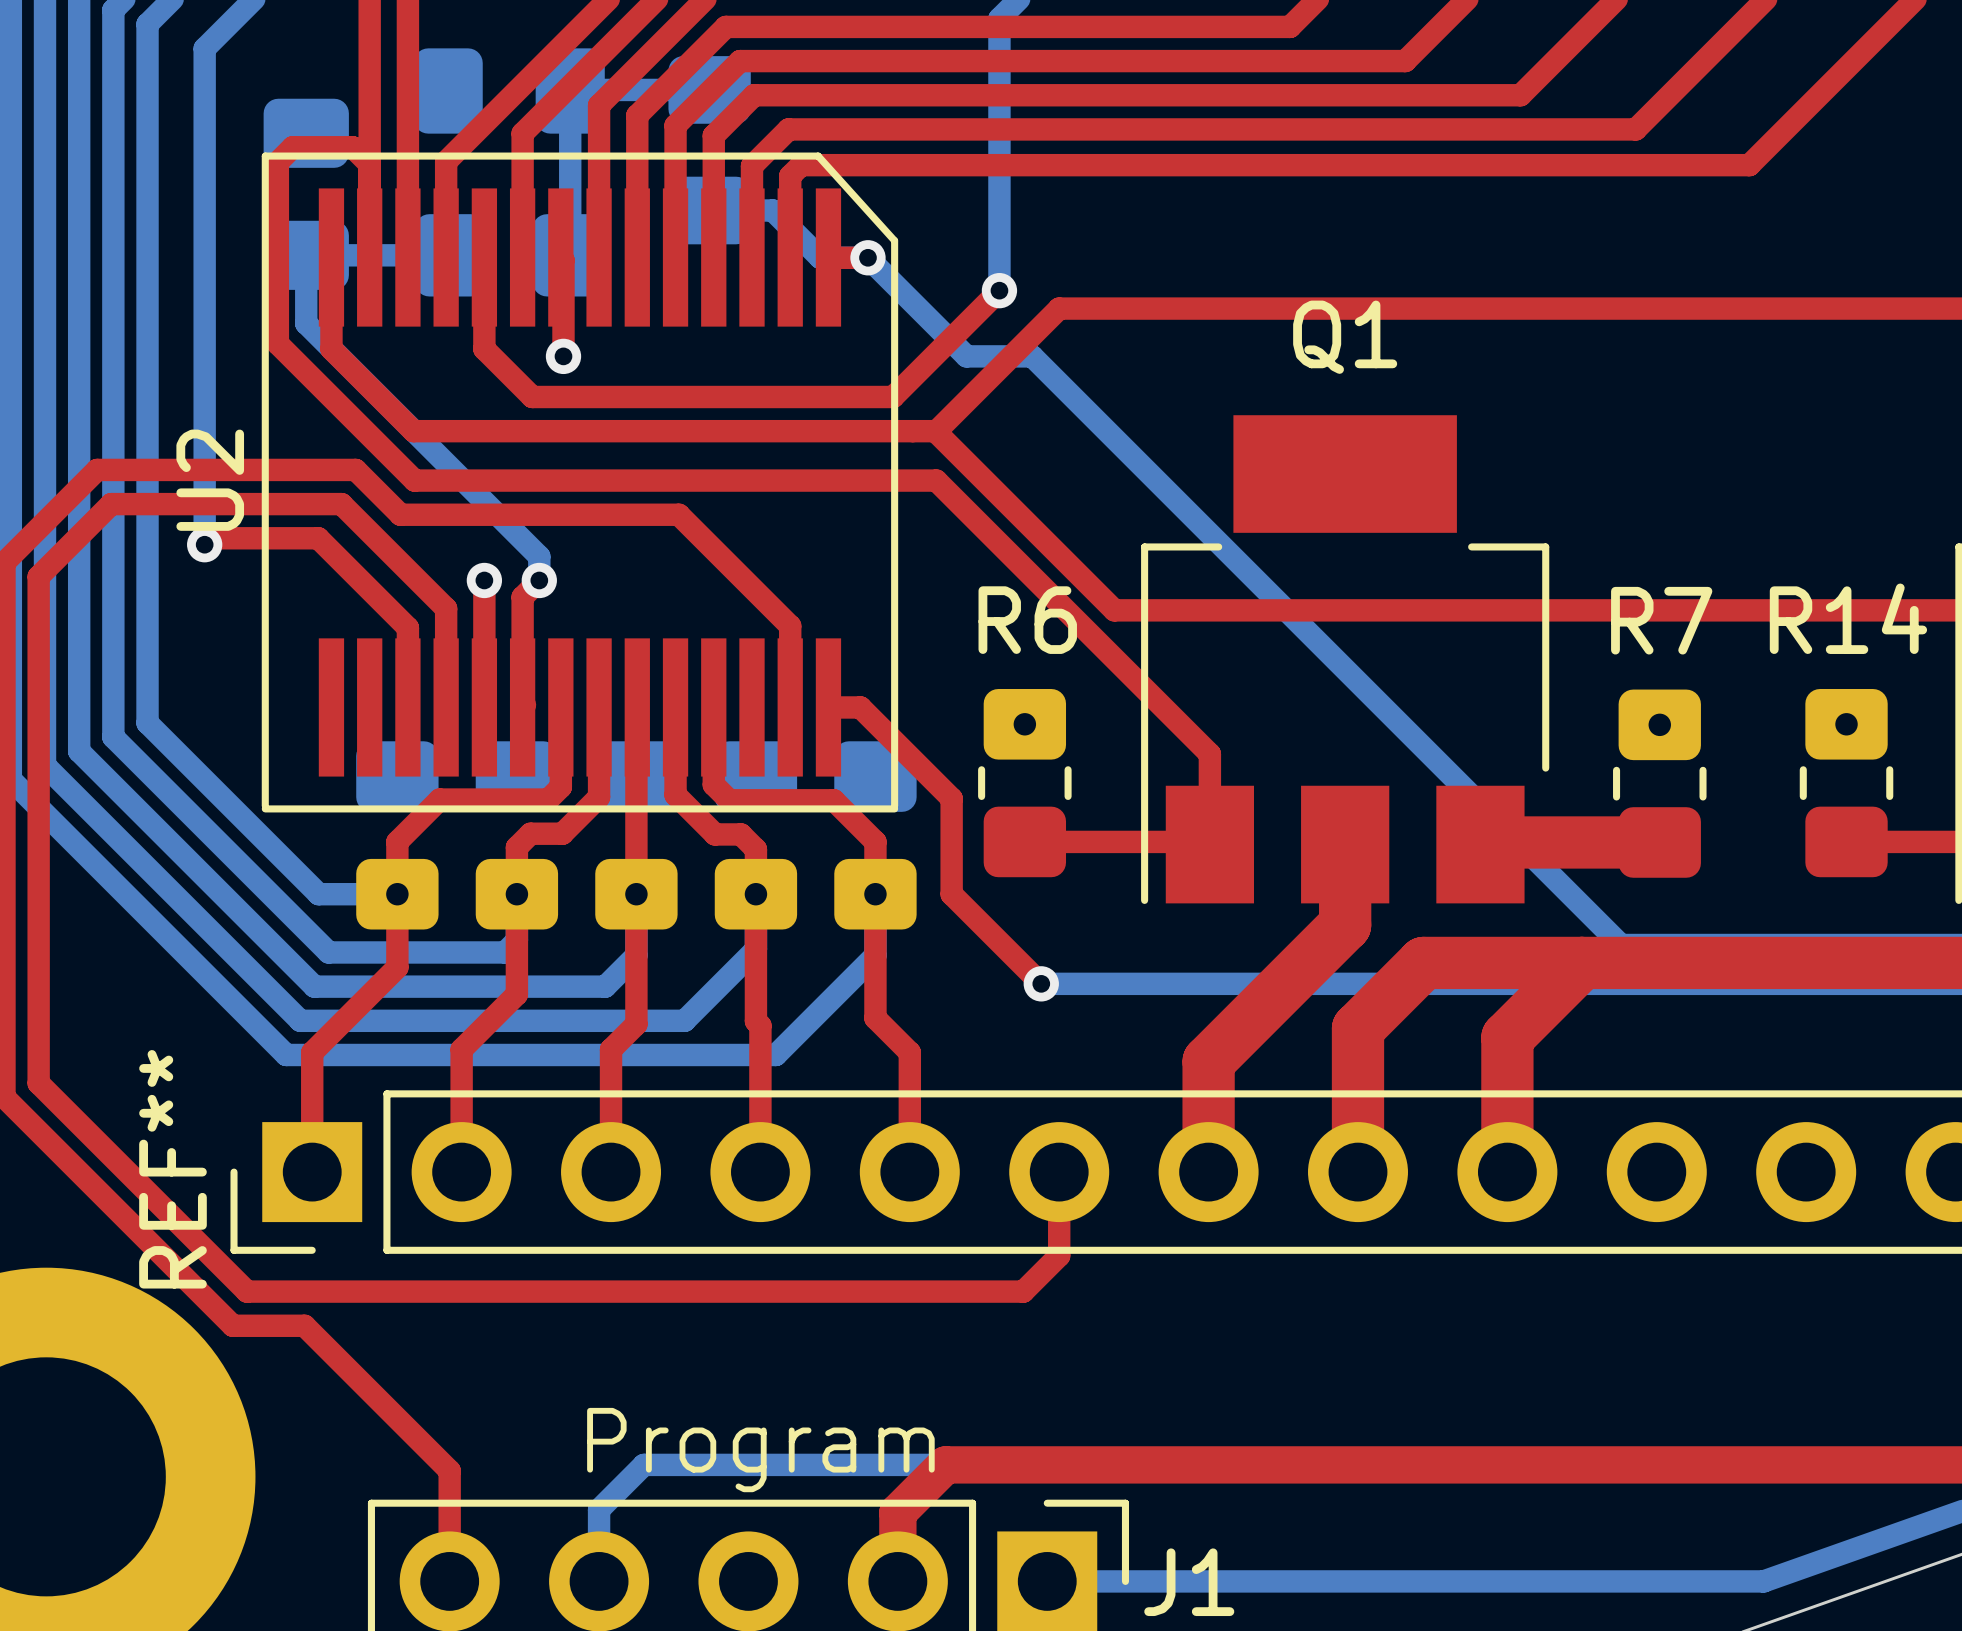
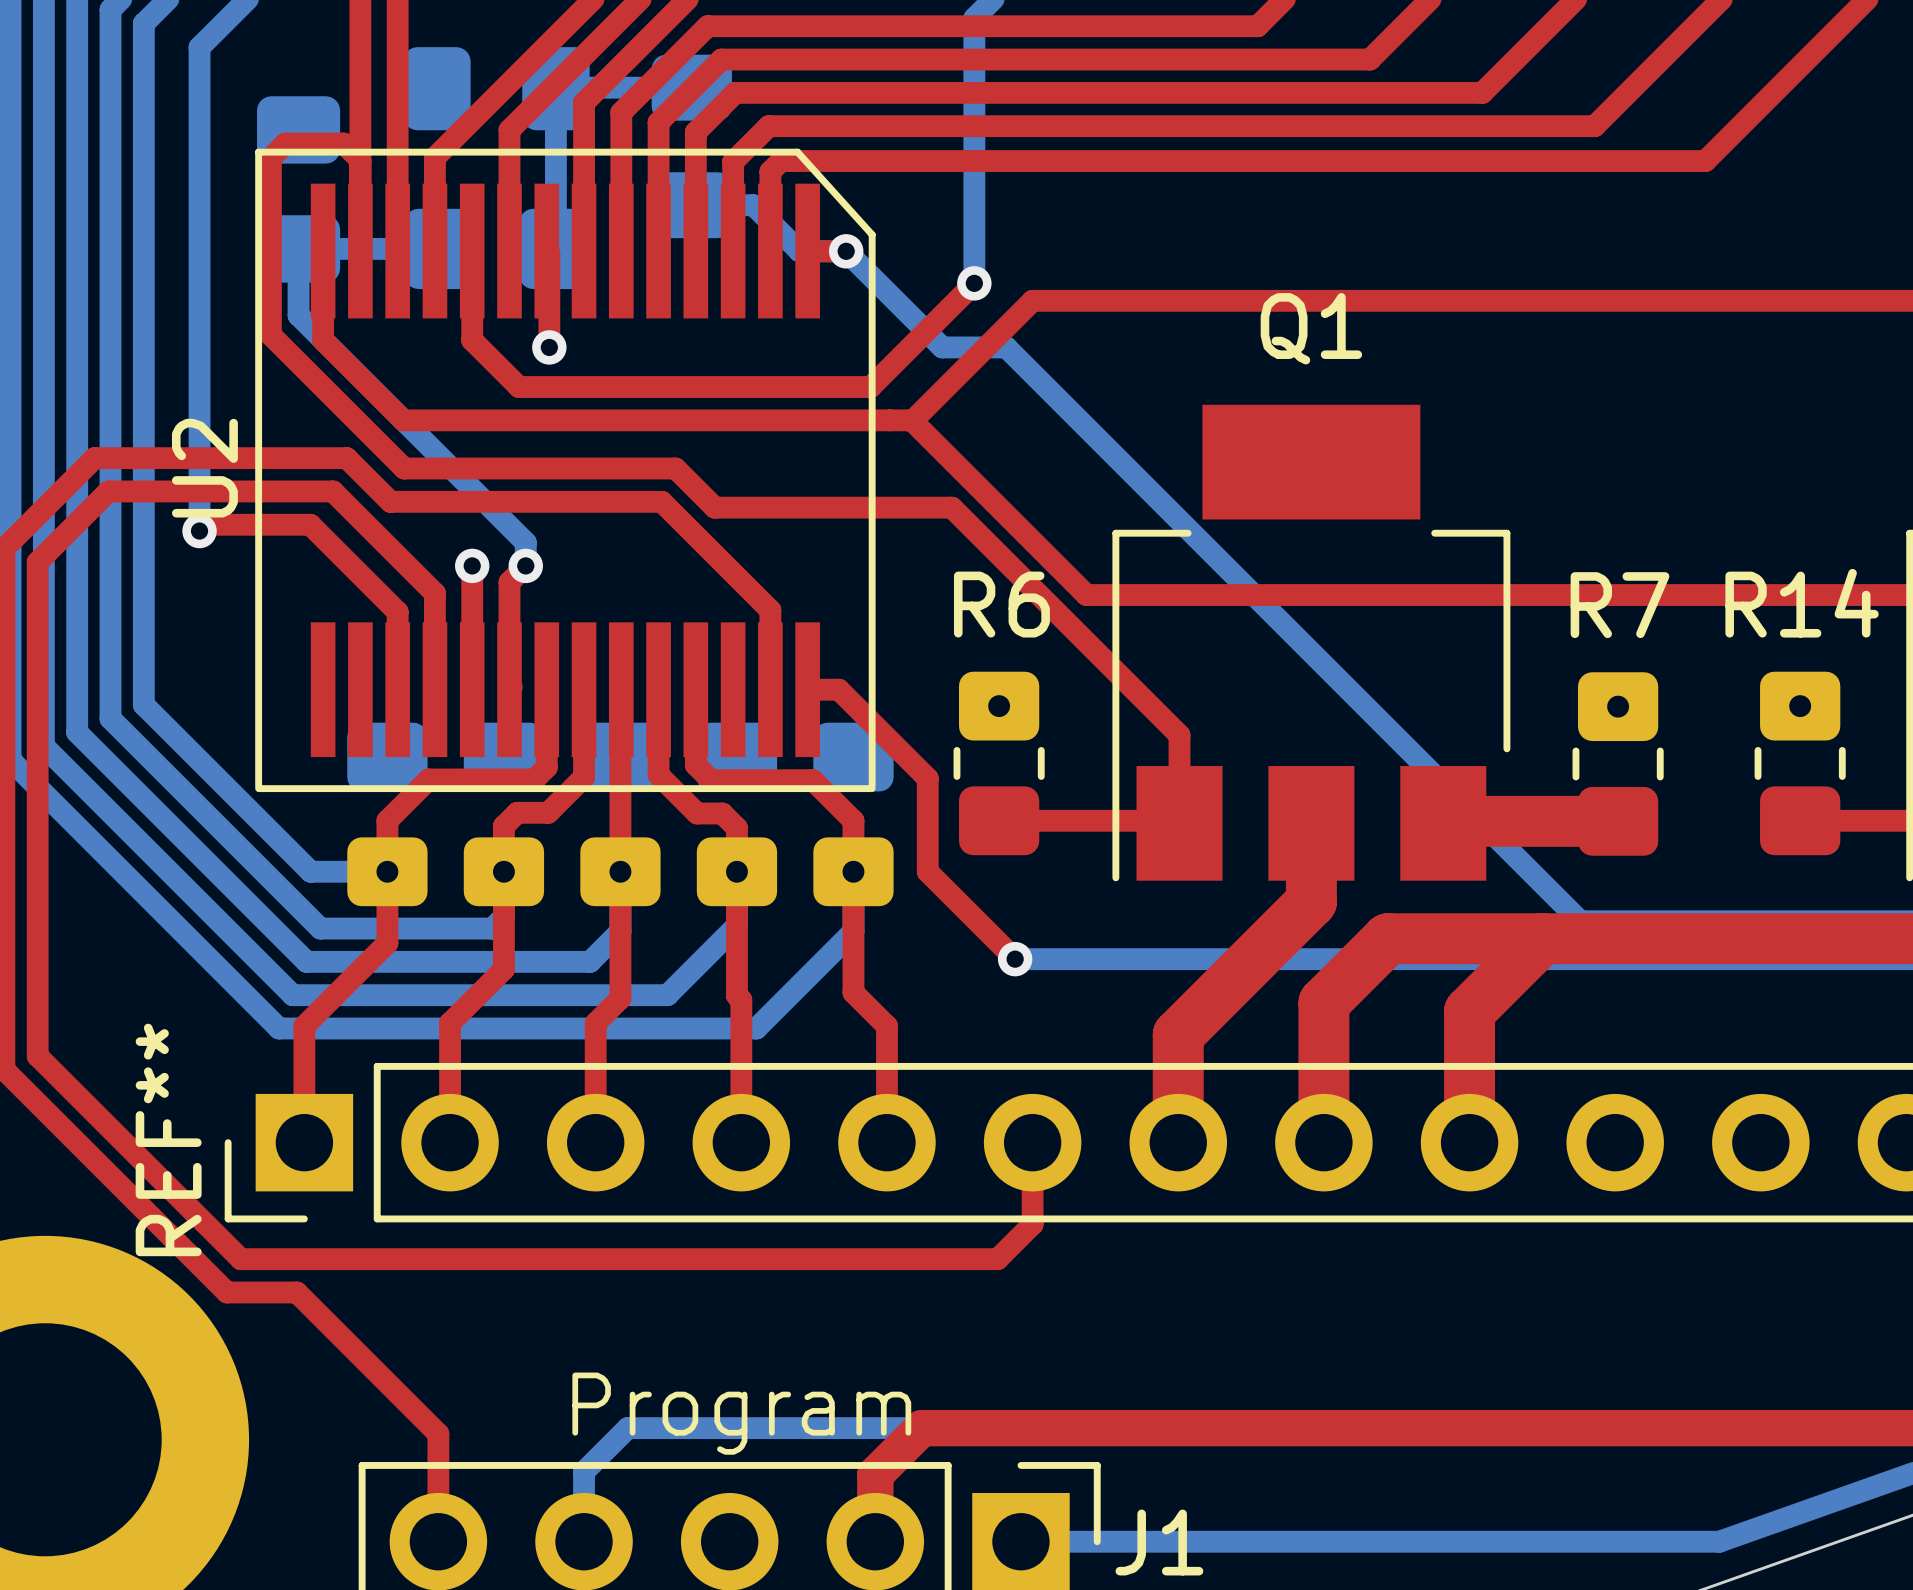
top track: (693, 480) (936, 480) (976, 520) -> (675, 468) (714, 507) (951, 507)

